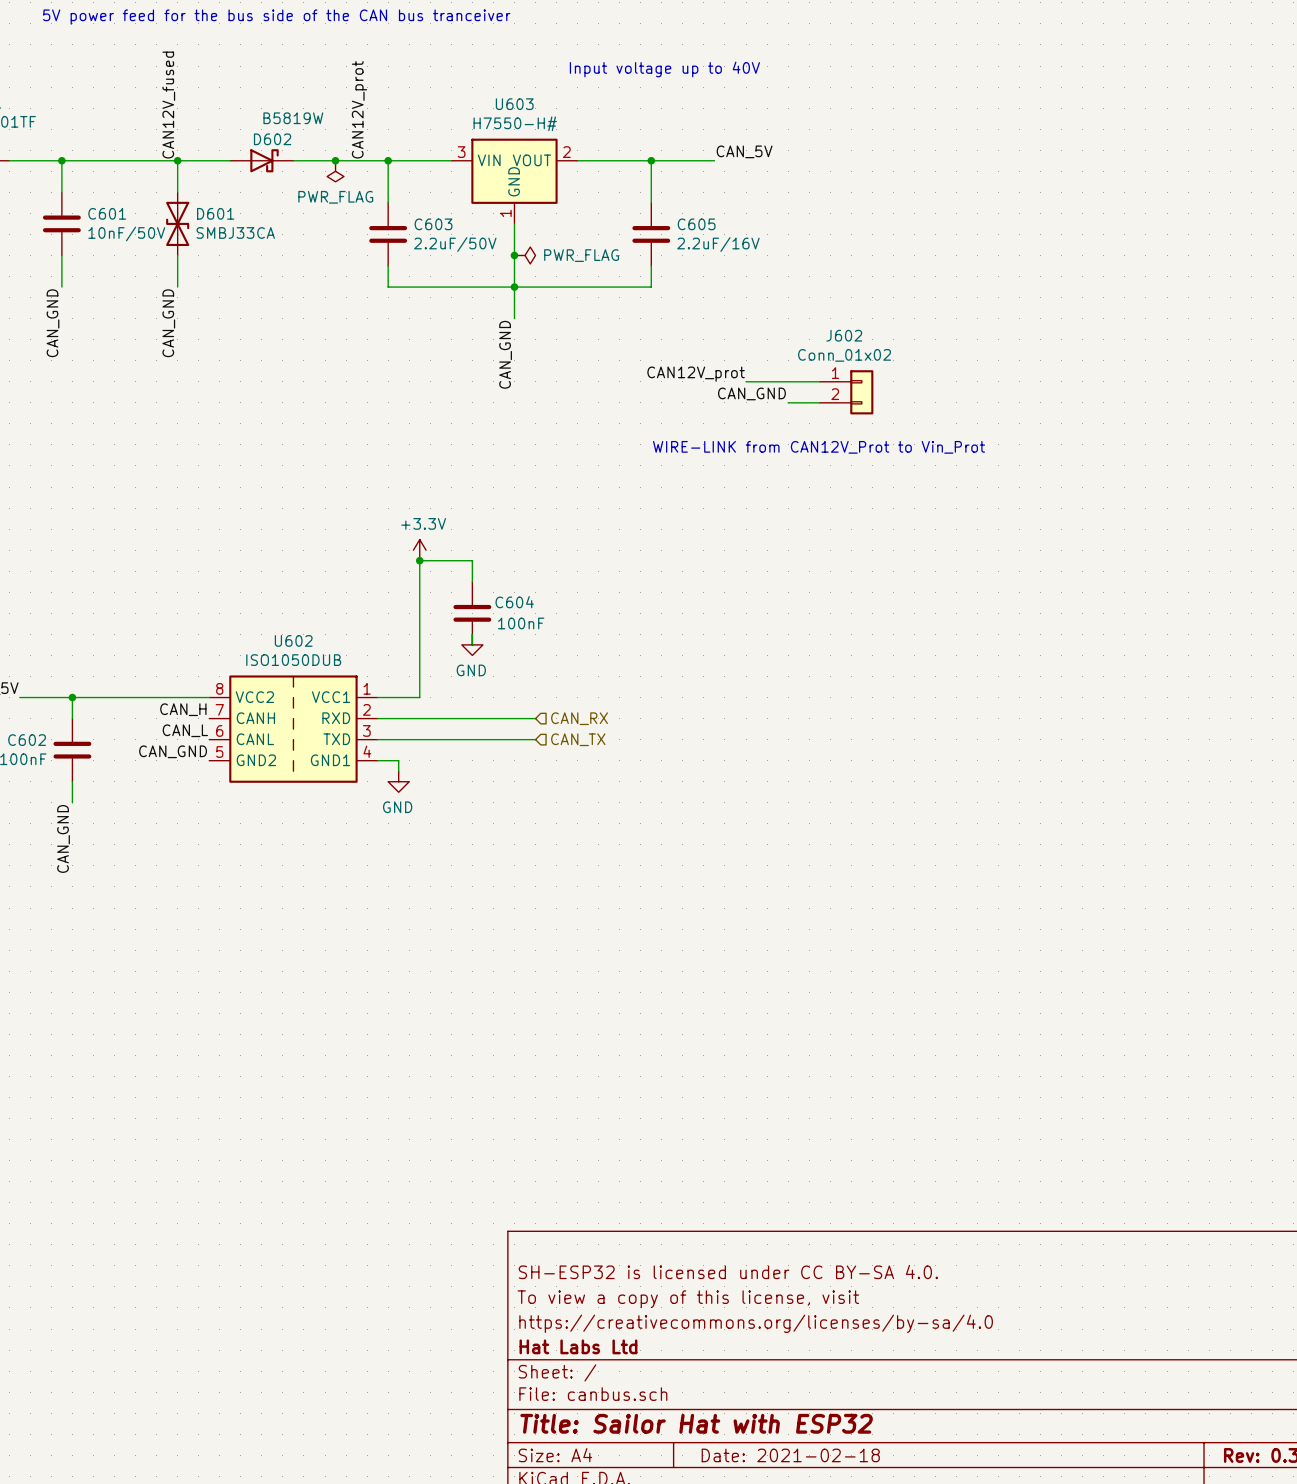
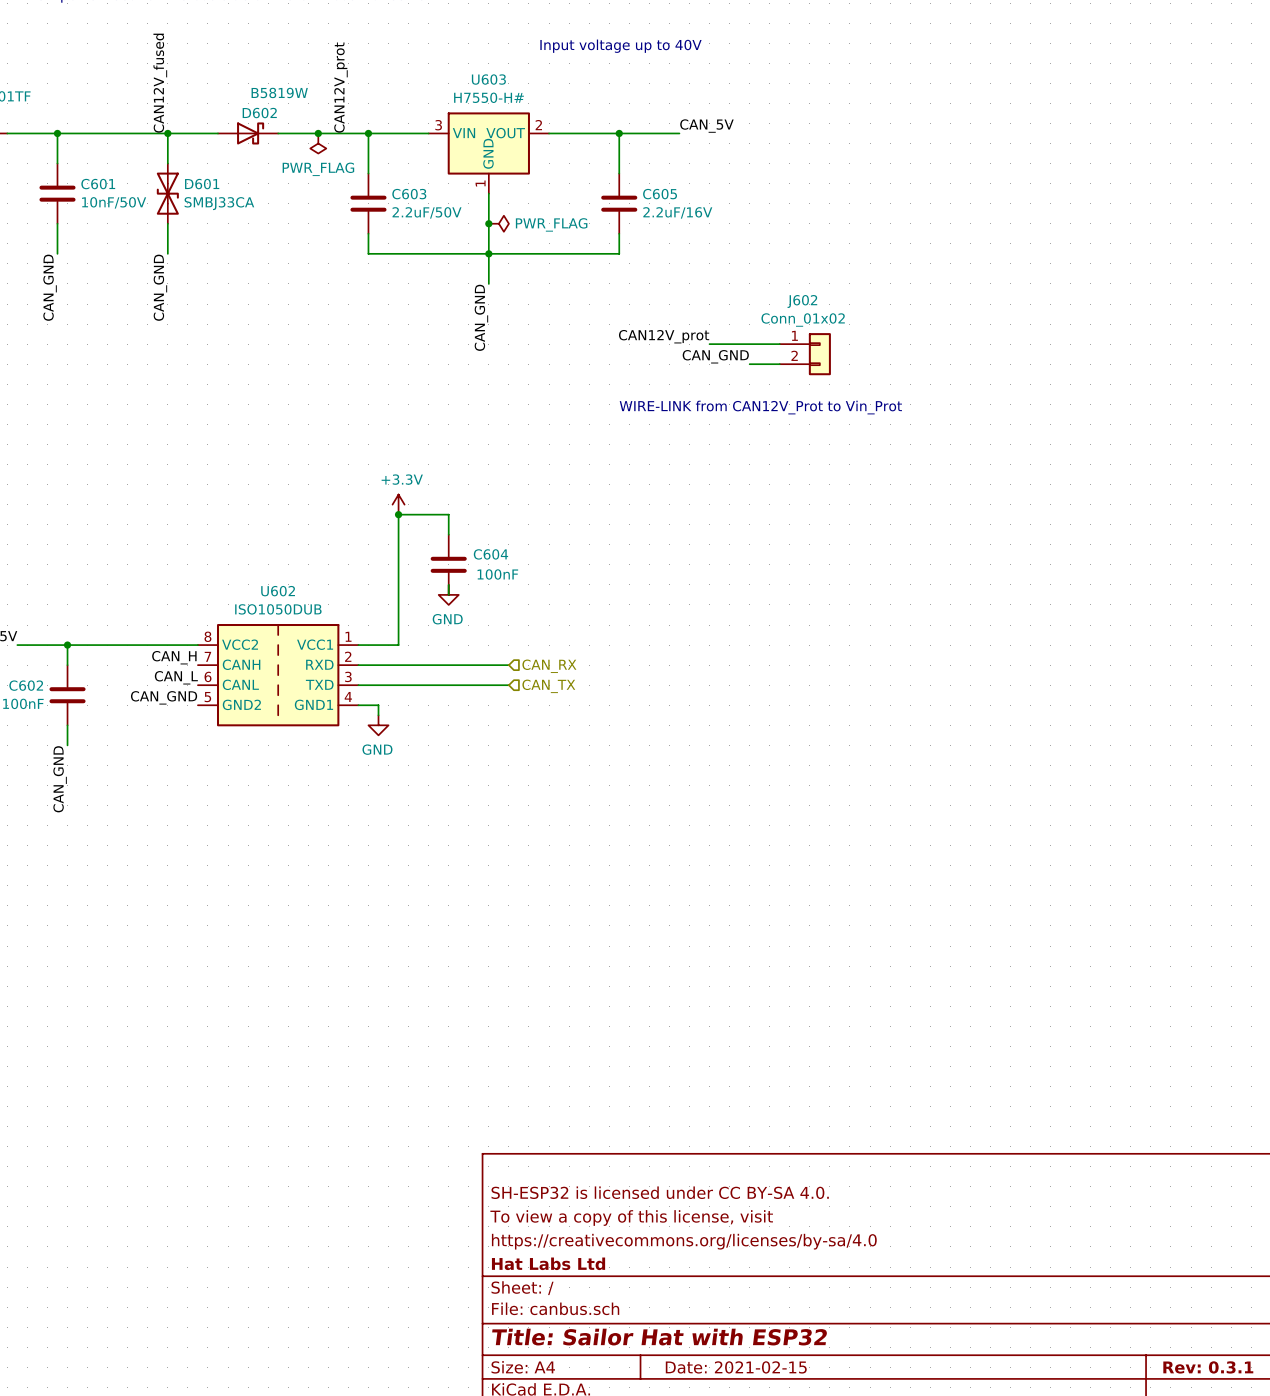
title block: Date: 2021-02-18 (790, 1455) -> Date: 2021-02-15 (736, 1367)

